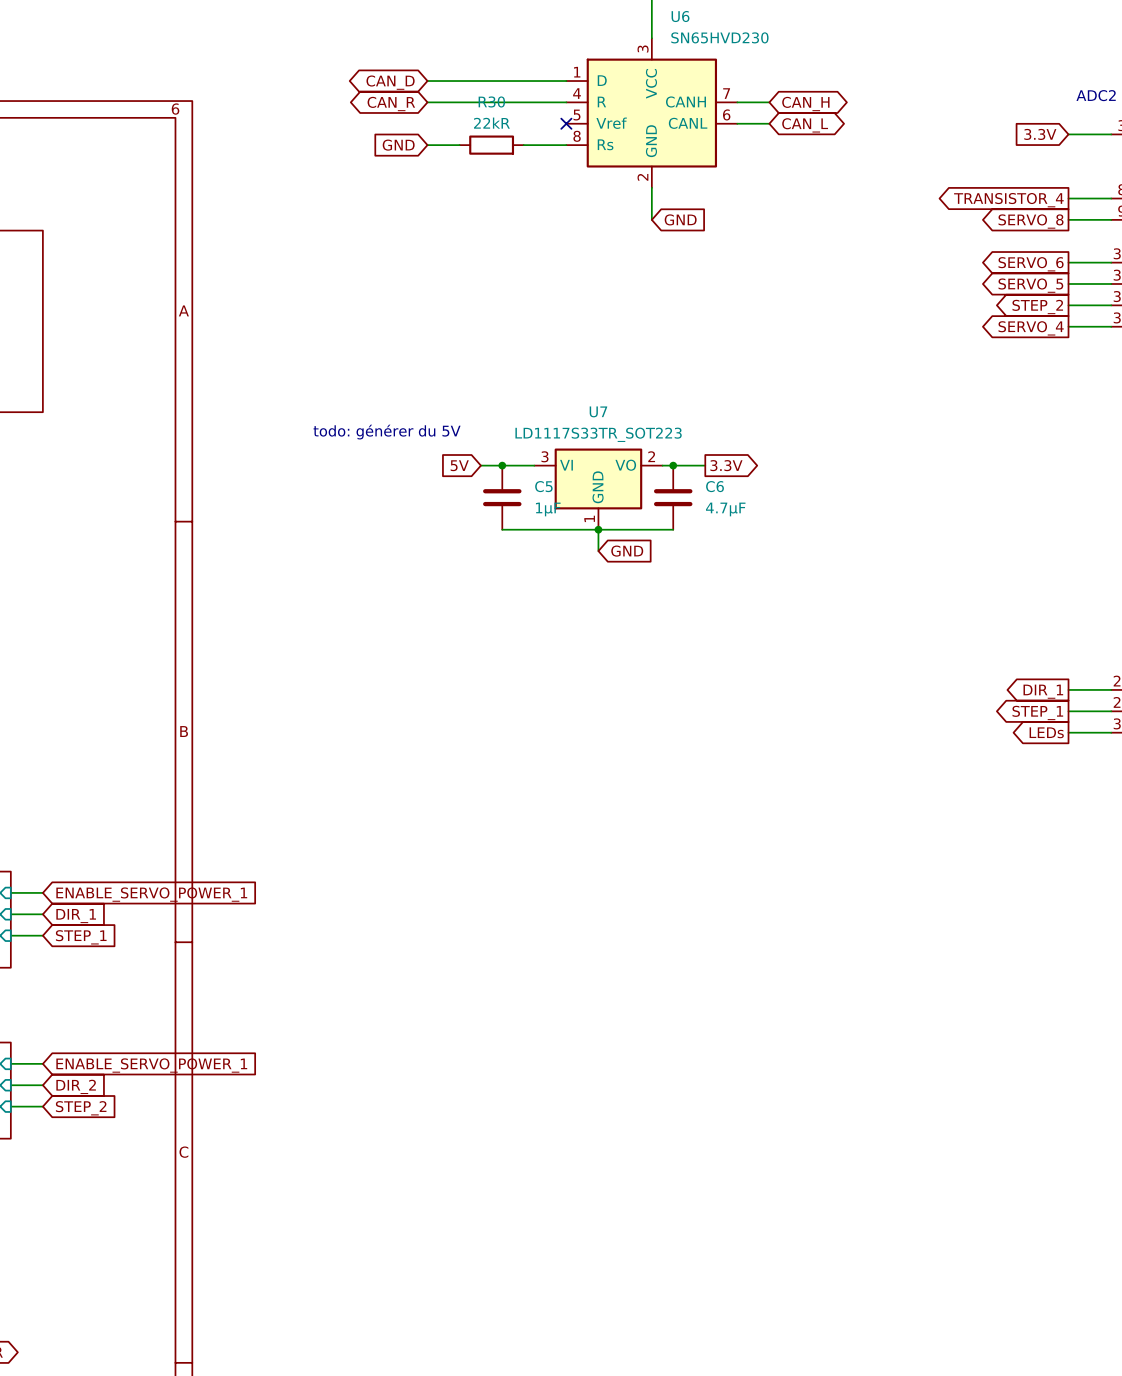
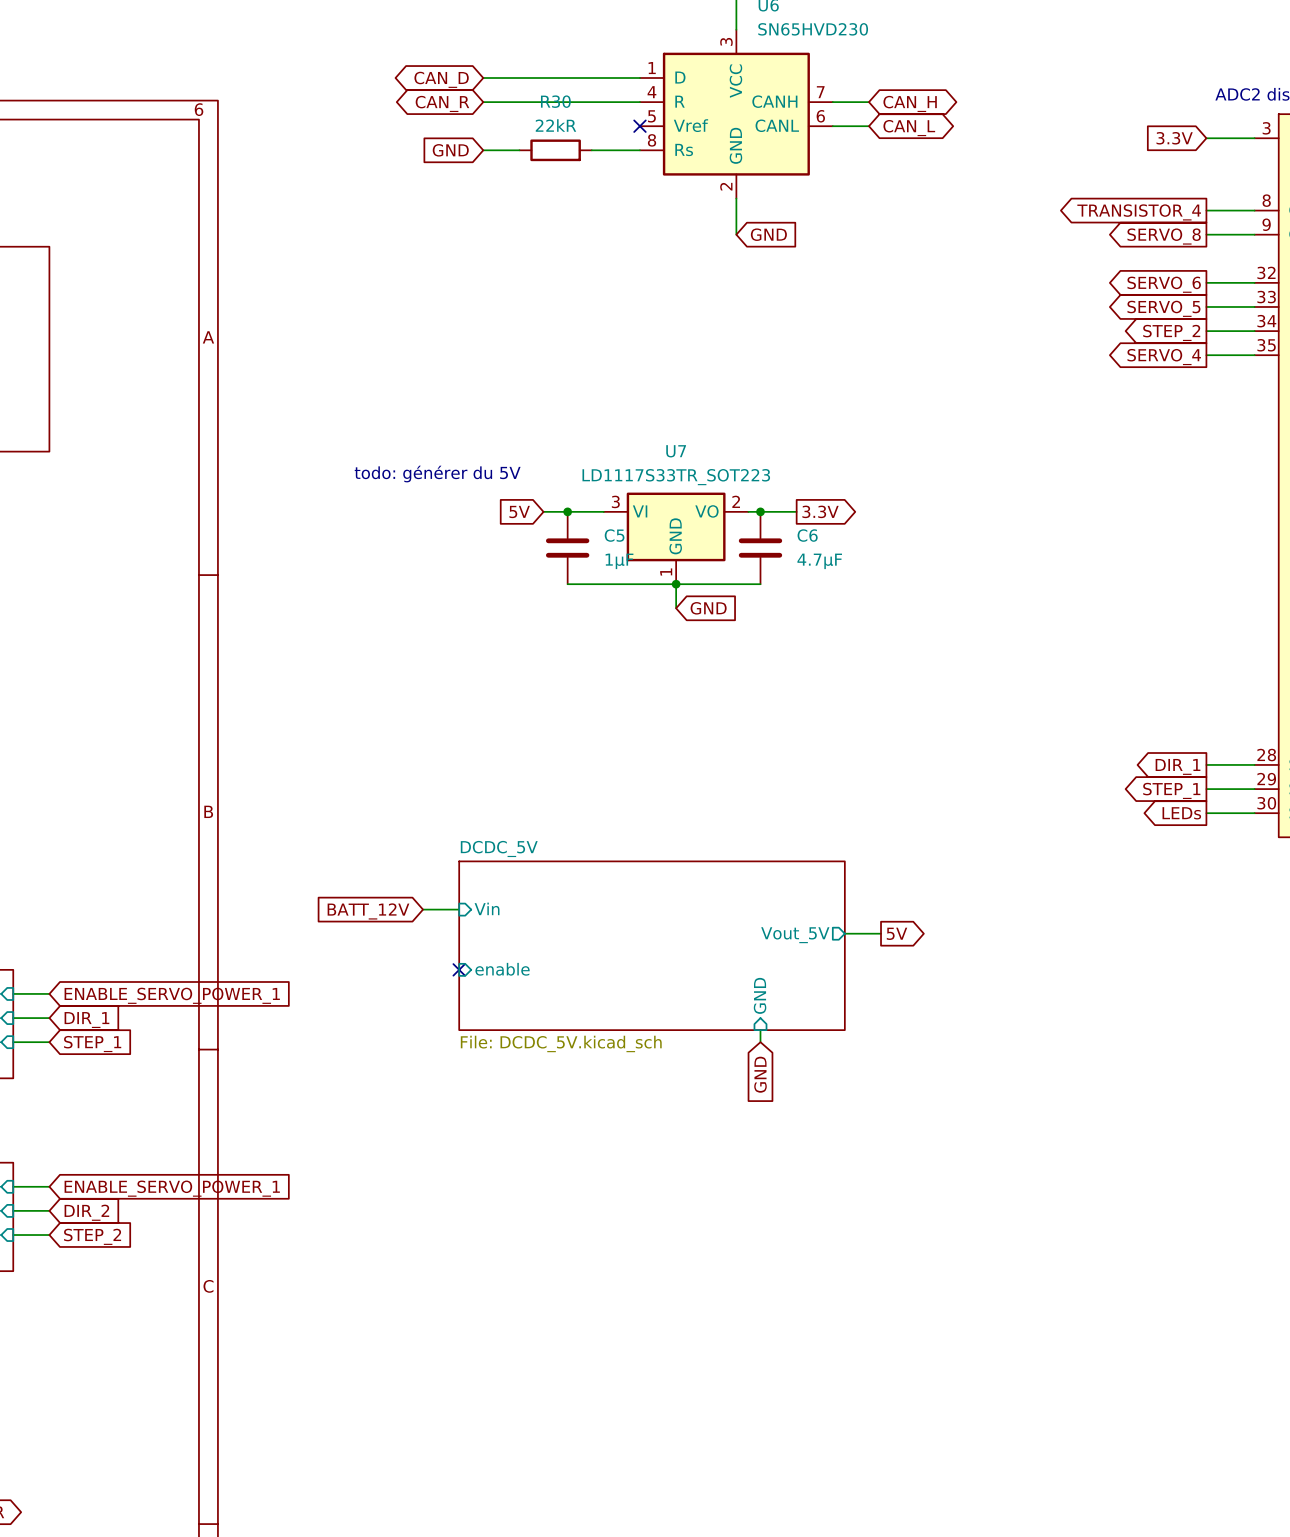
sheet pin: none -> Vin (487, 908)
wire: none -> (423, 909) (459, 909)
global label: none -> BATT_12V (368, 911)
wire: none -> (844, 933) (881, 933)
global label: none -> 5V (897, 933)
sheet pin: none -> Vout_5V (795, 935)
sheet DCDC_5V: none -> File: DCDC_5V.kicad_sch (652, 945)
no-connect mark: none -> (459, 969)
sheet pin: none -> enable (502, 969)
sheet pin: none -> GND (760, 995)
wire: none -> (760, 1030) (760, 1042)
global label: none -> GND (760, 1074)

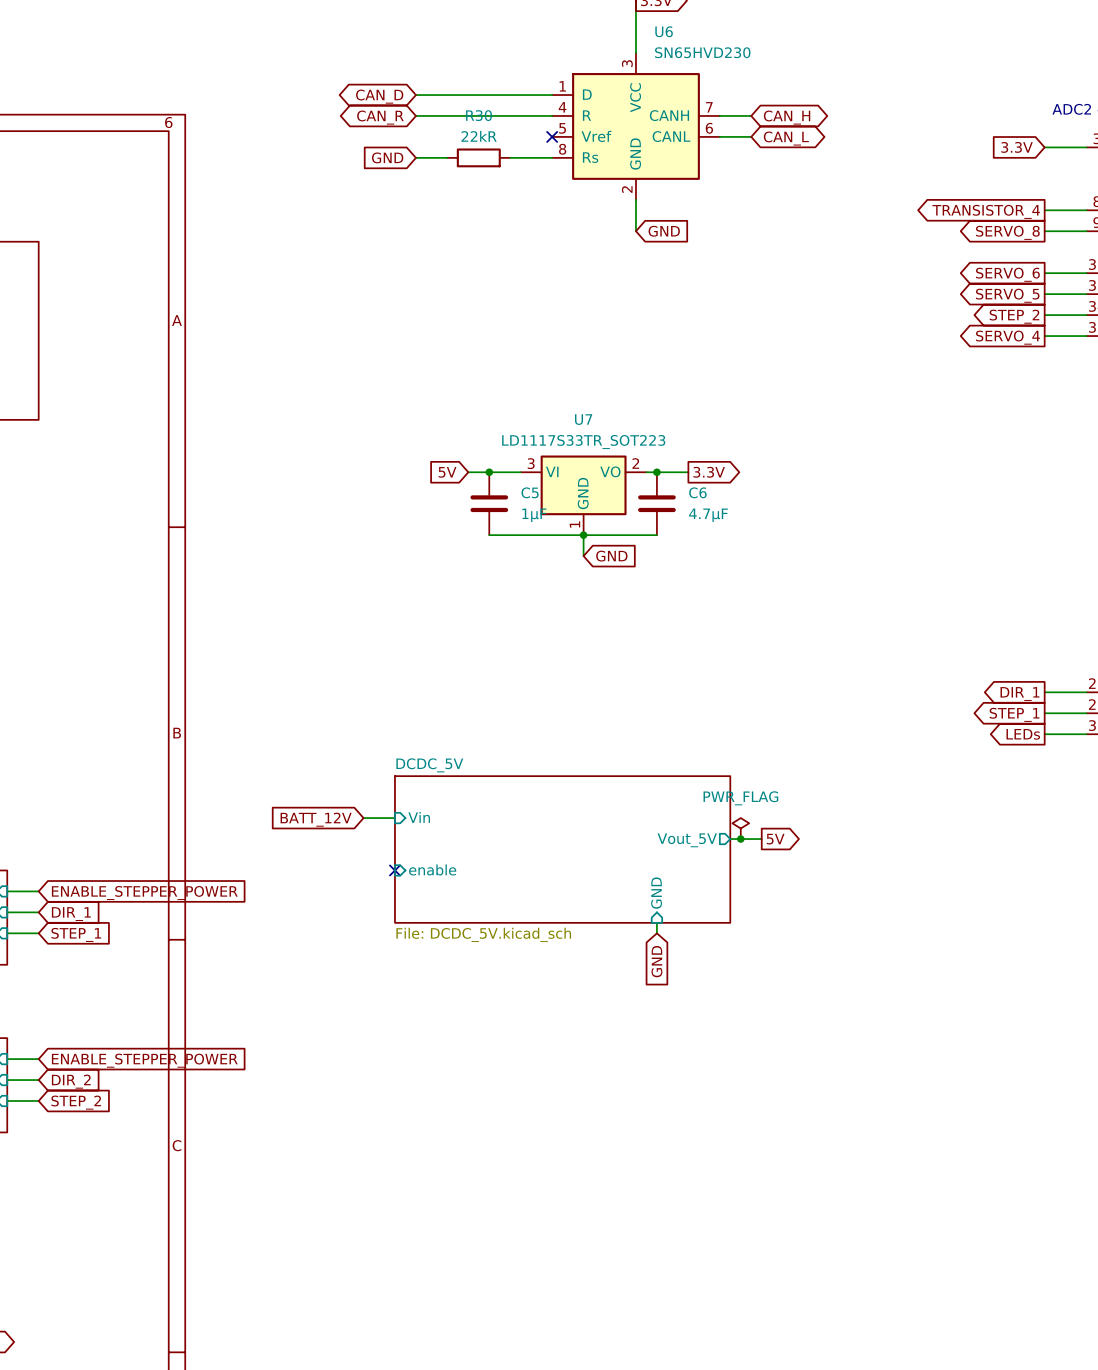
text: todo: générer du 5V (437, 474) -> none
power symbol: none -> PWR_FLAG (740, 828)
junction: none -> (740, 839)
global label: ENABLE_SERVO_POWER_1 (172, 995) -> ENABLE_STEPPER_POWER (144, 893)
global label: ENABLE_SERVO_POWER_1 (172, 1188) -> ENABLE_STEPPER_POWER (144, 1060)

